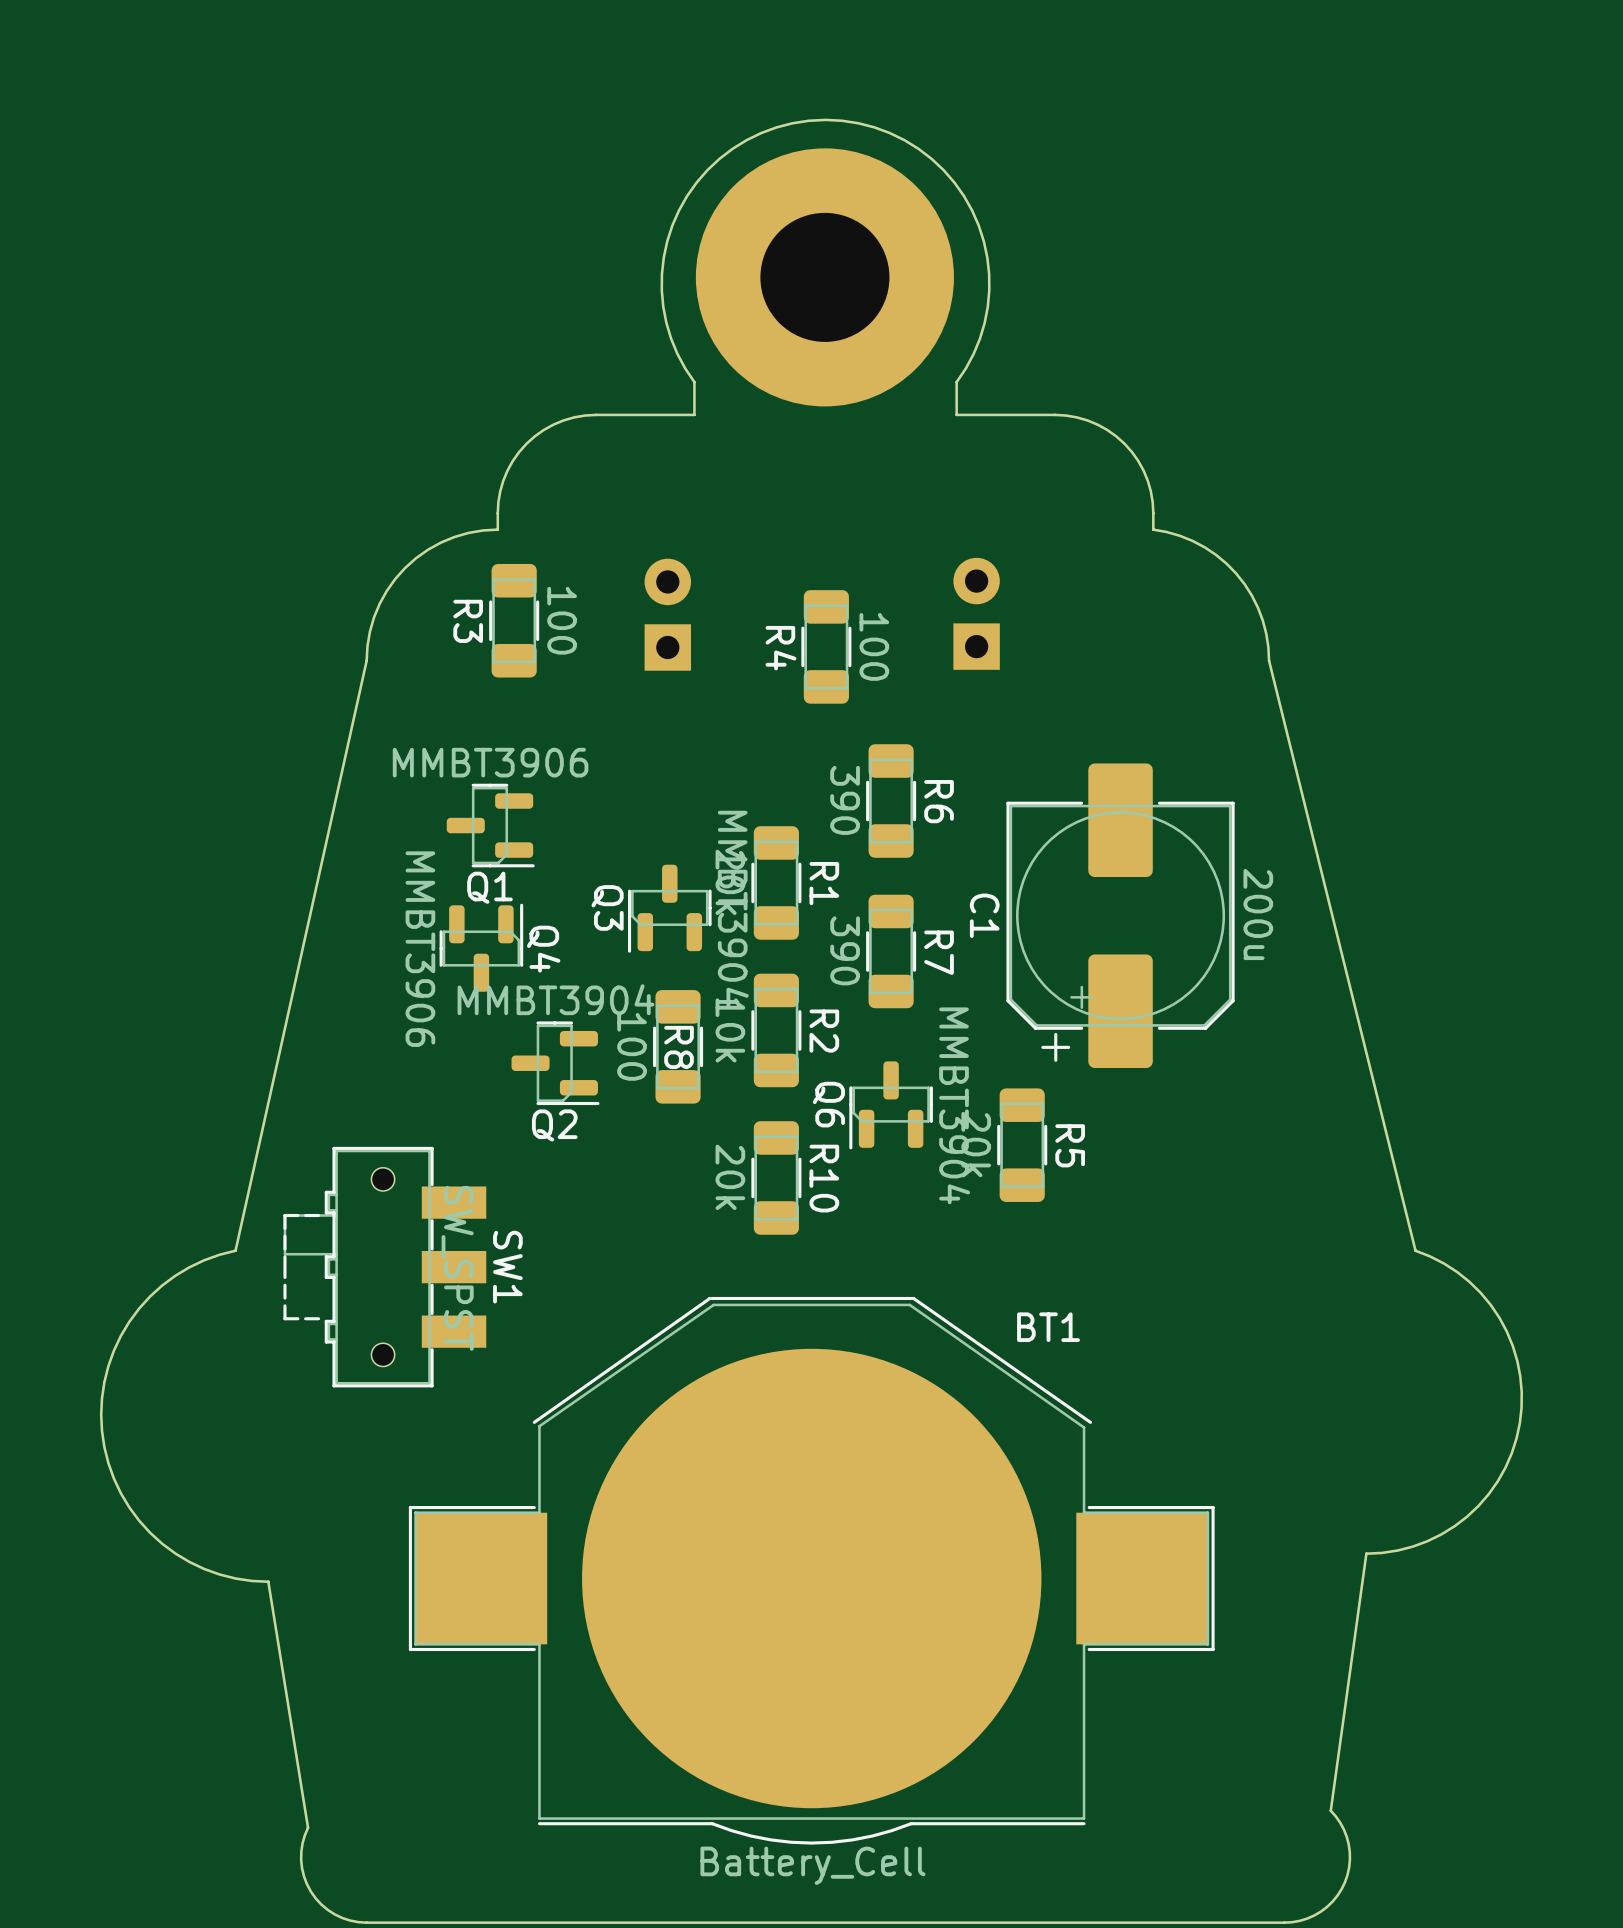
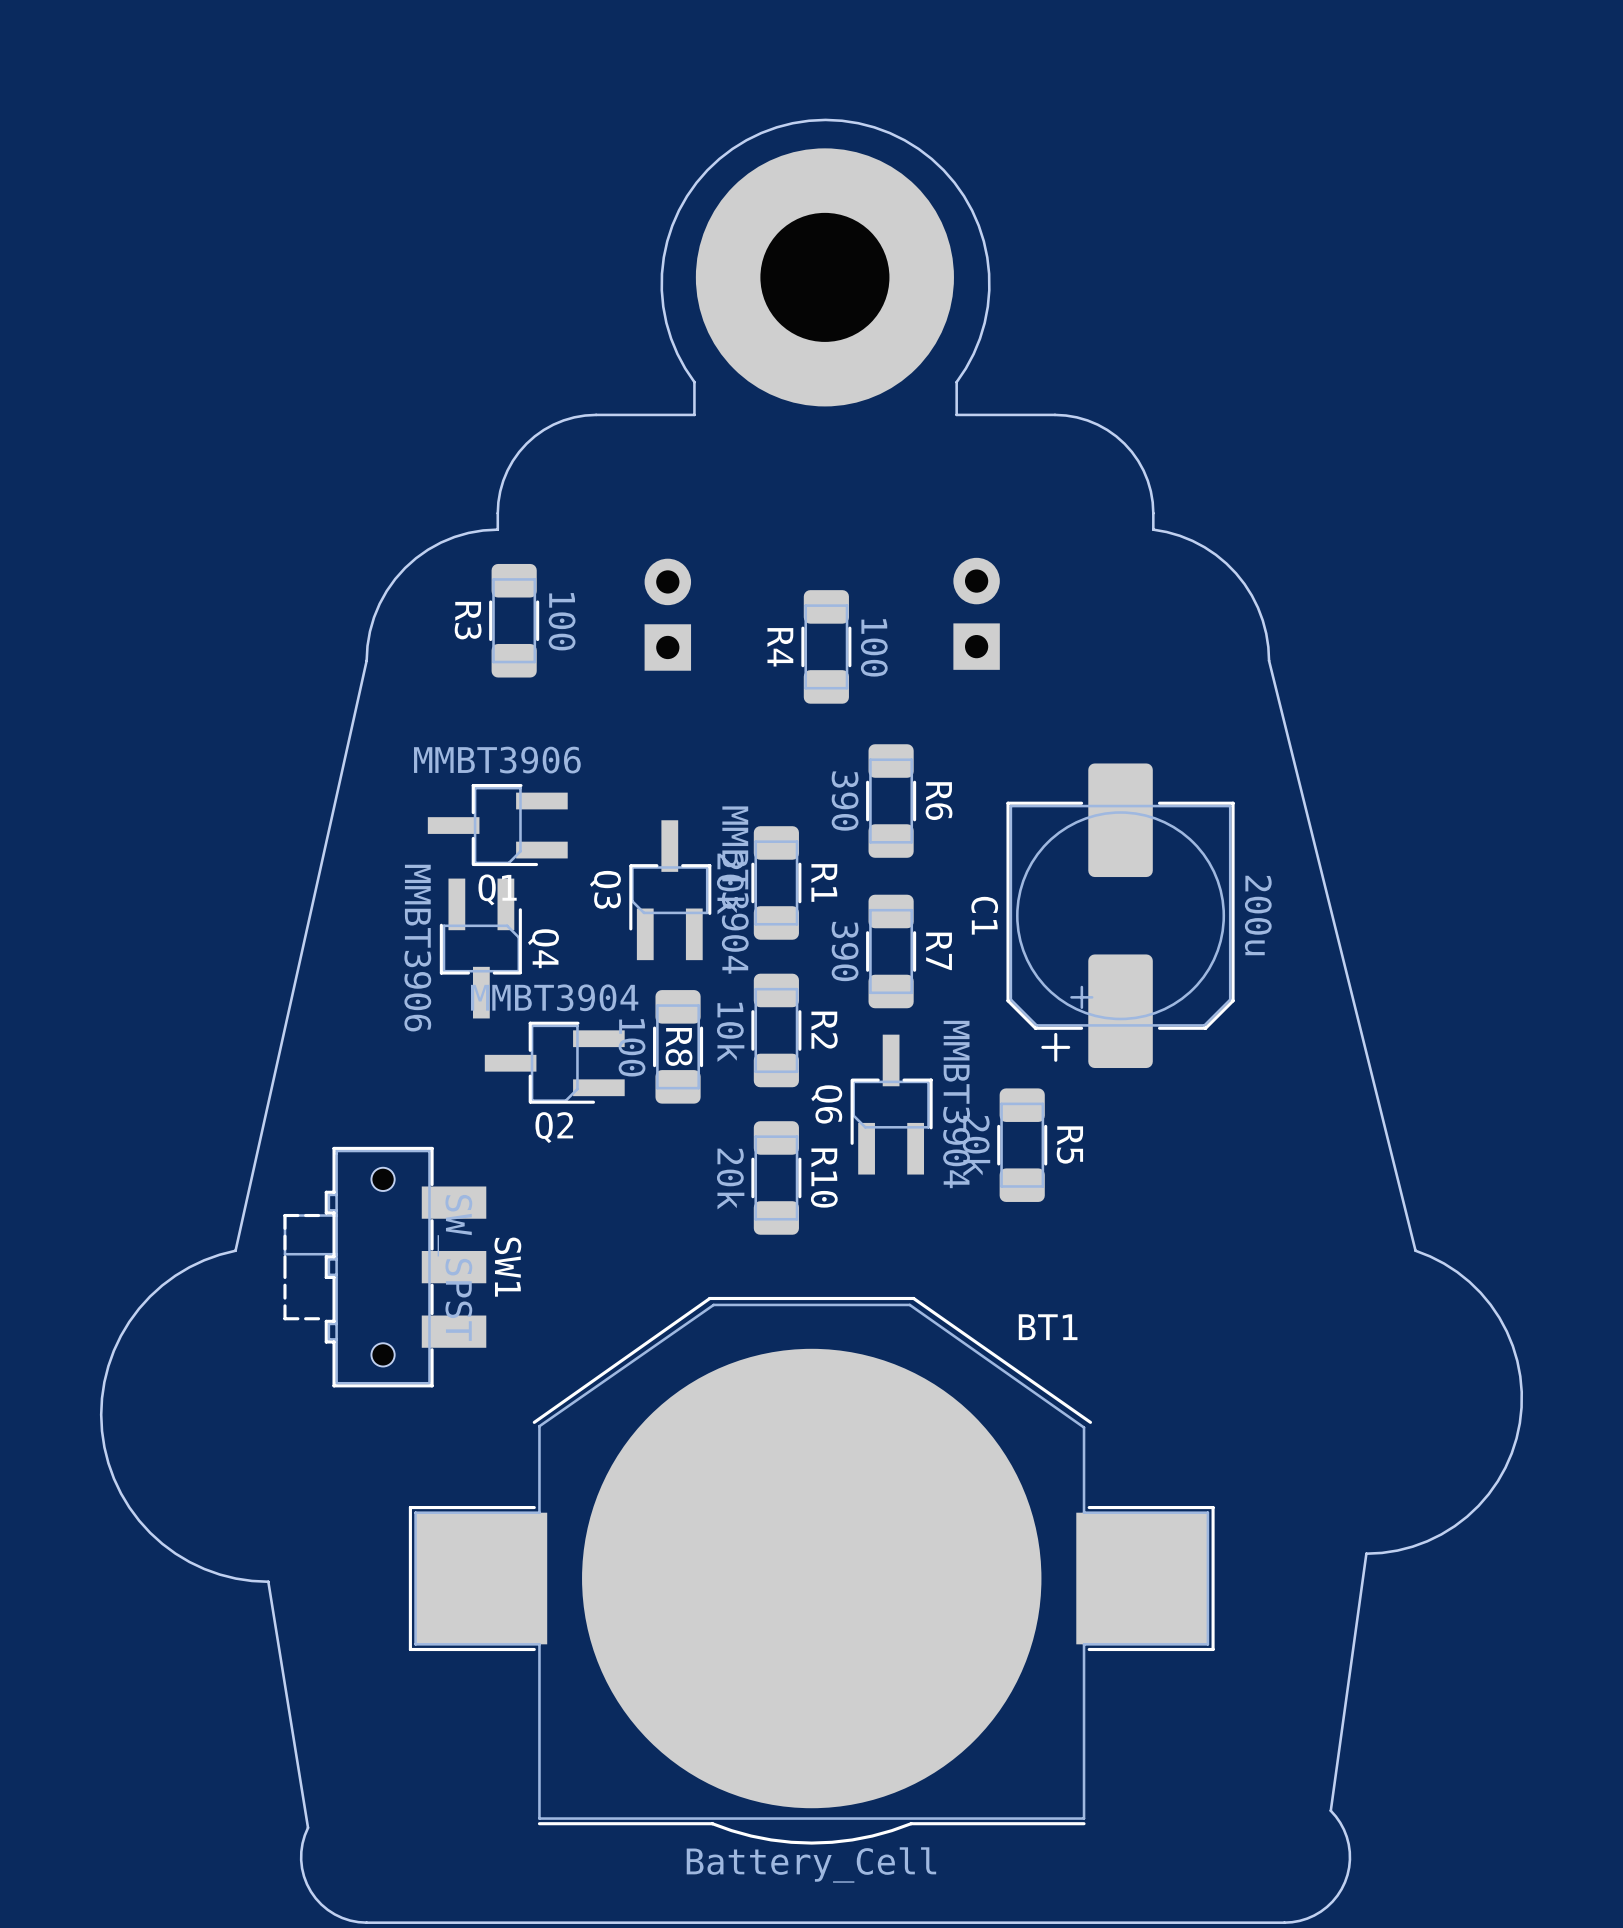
Q1 footprint: [446, 783, 535, 868] -> [427, 783, 568, 867]
Q3 footprint: [627, 864, 712, 953] -> [629, 820, 712, 961]
Q4 footprint: [439, 903, 524, 992] -> [439, 878, 522, 1019]
Q2 footprint: [511, 1021, 600, 1106] -> [484, 1021, 625, 1104]
Q6 footprint: [849, 1061, 933, 1150] -> [850, 1034, 933, 1175]

